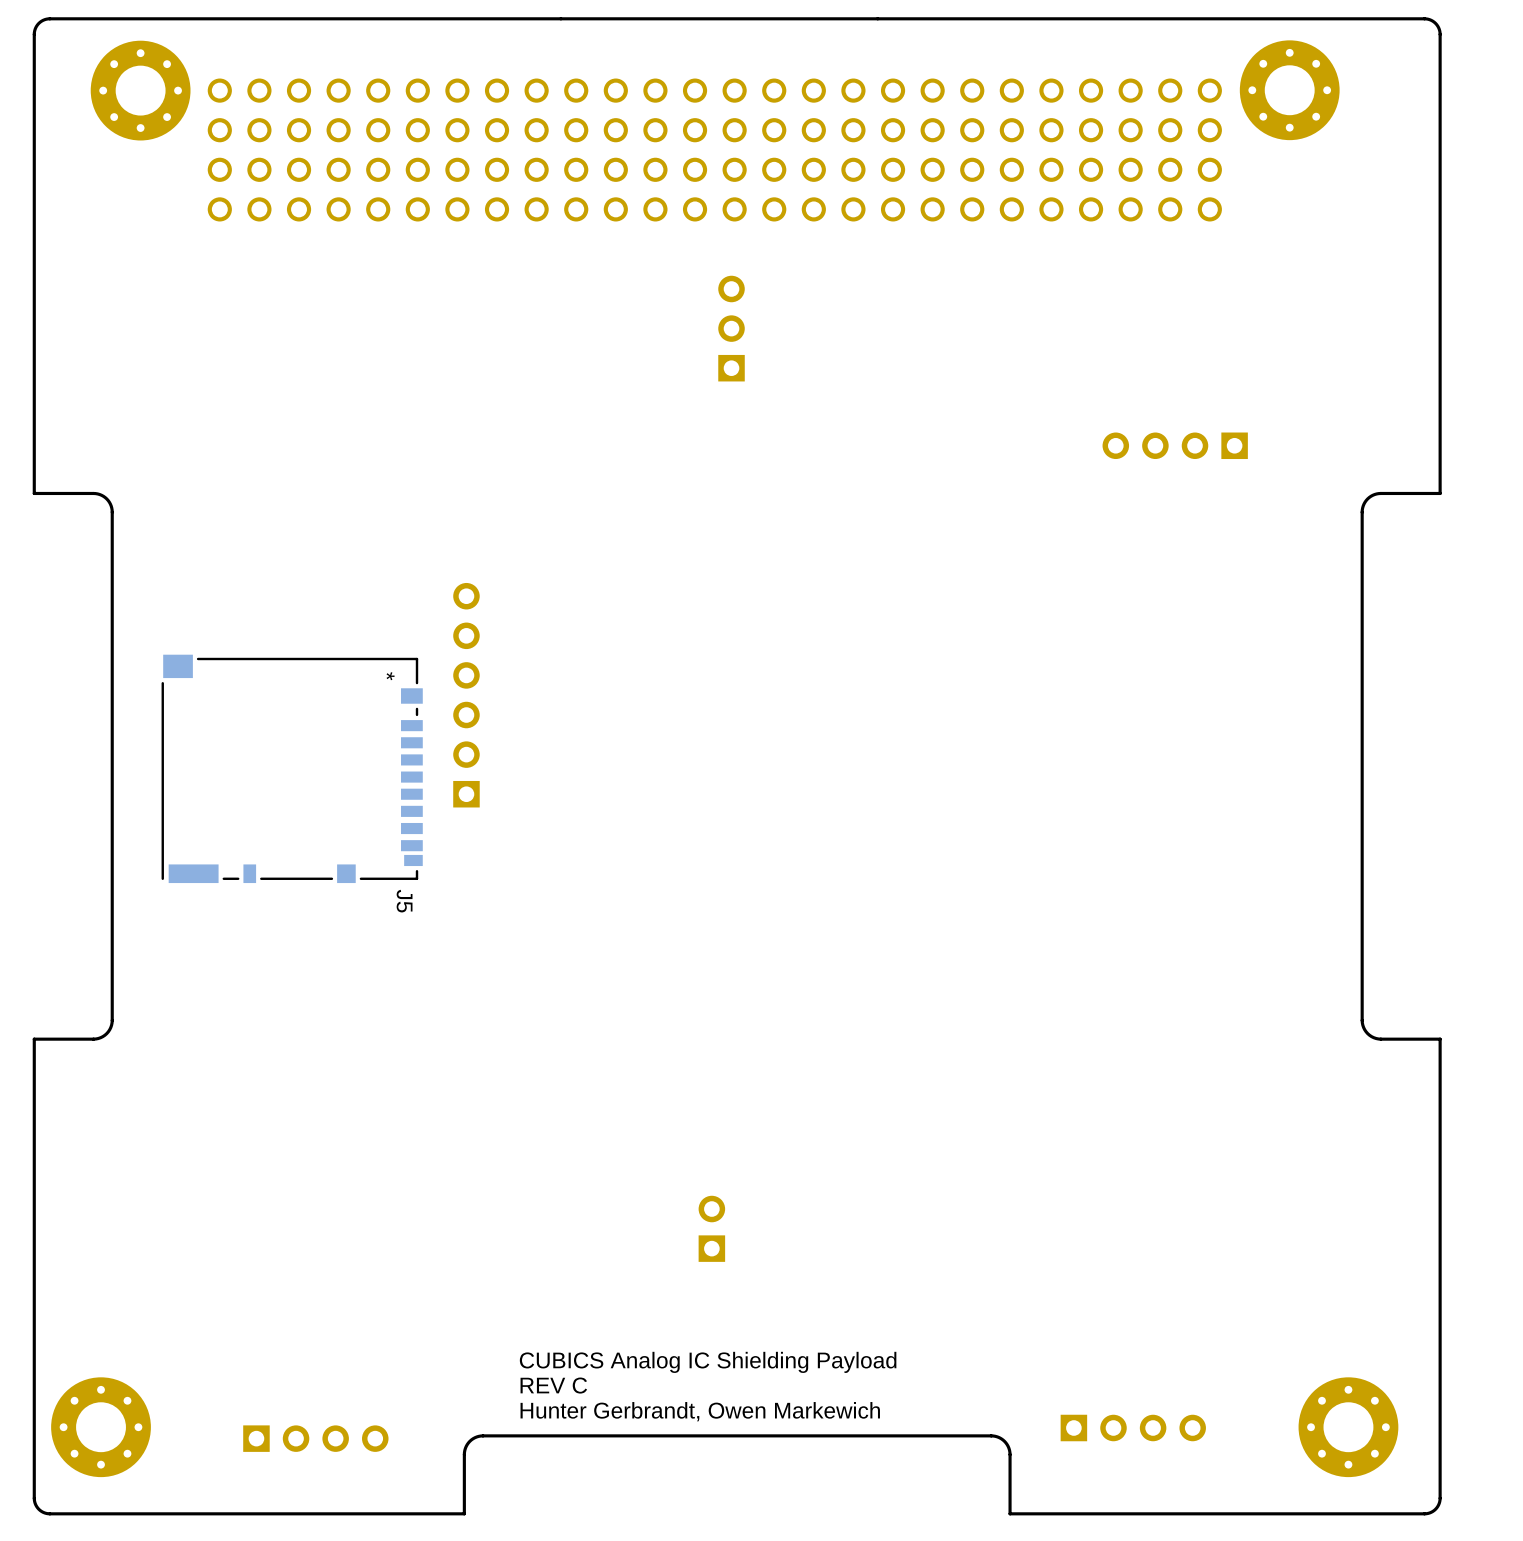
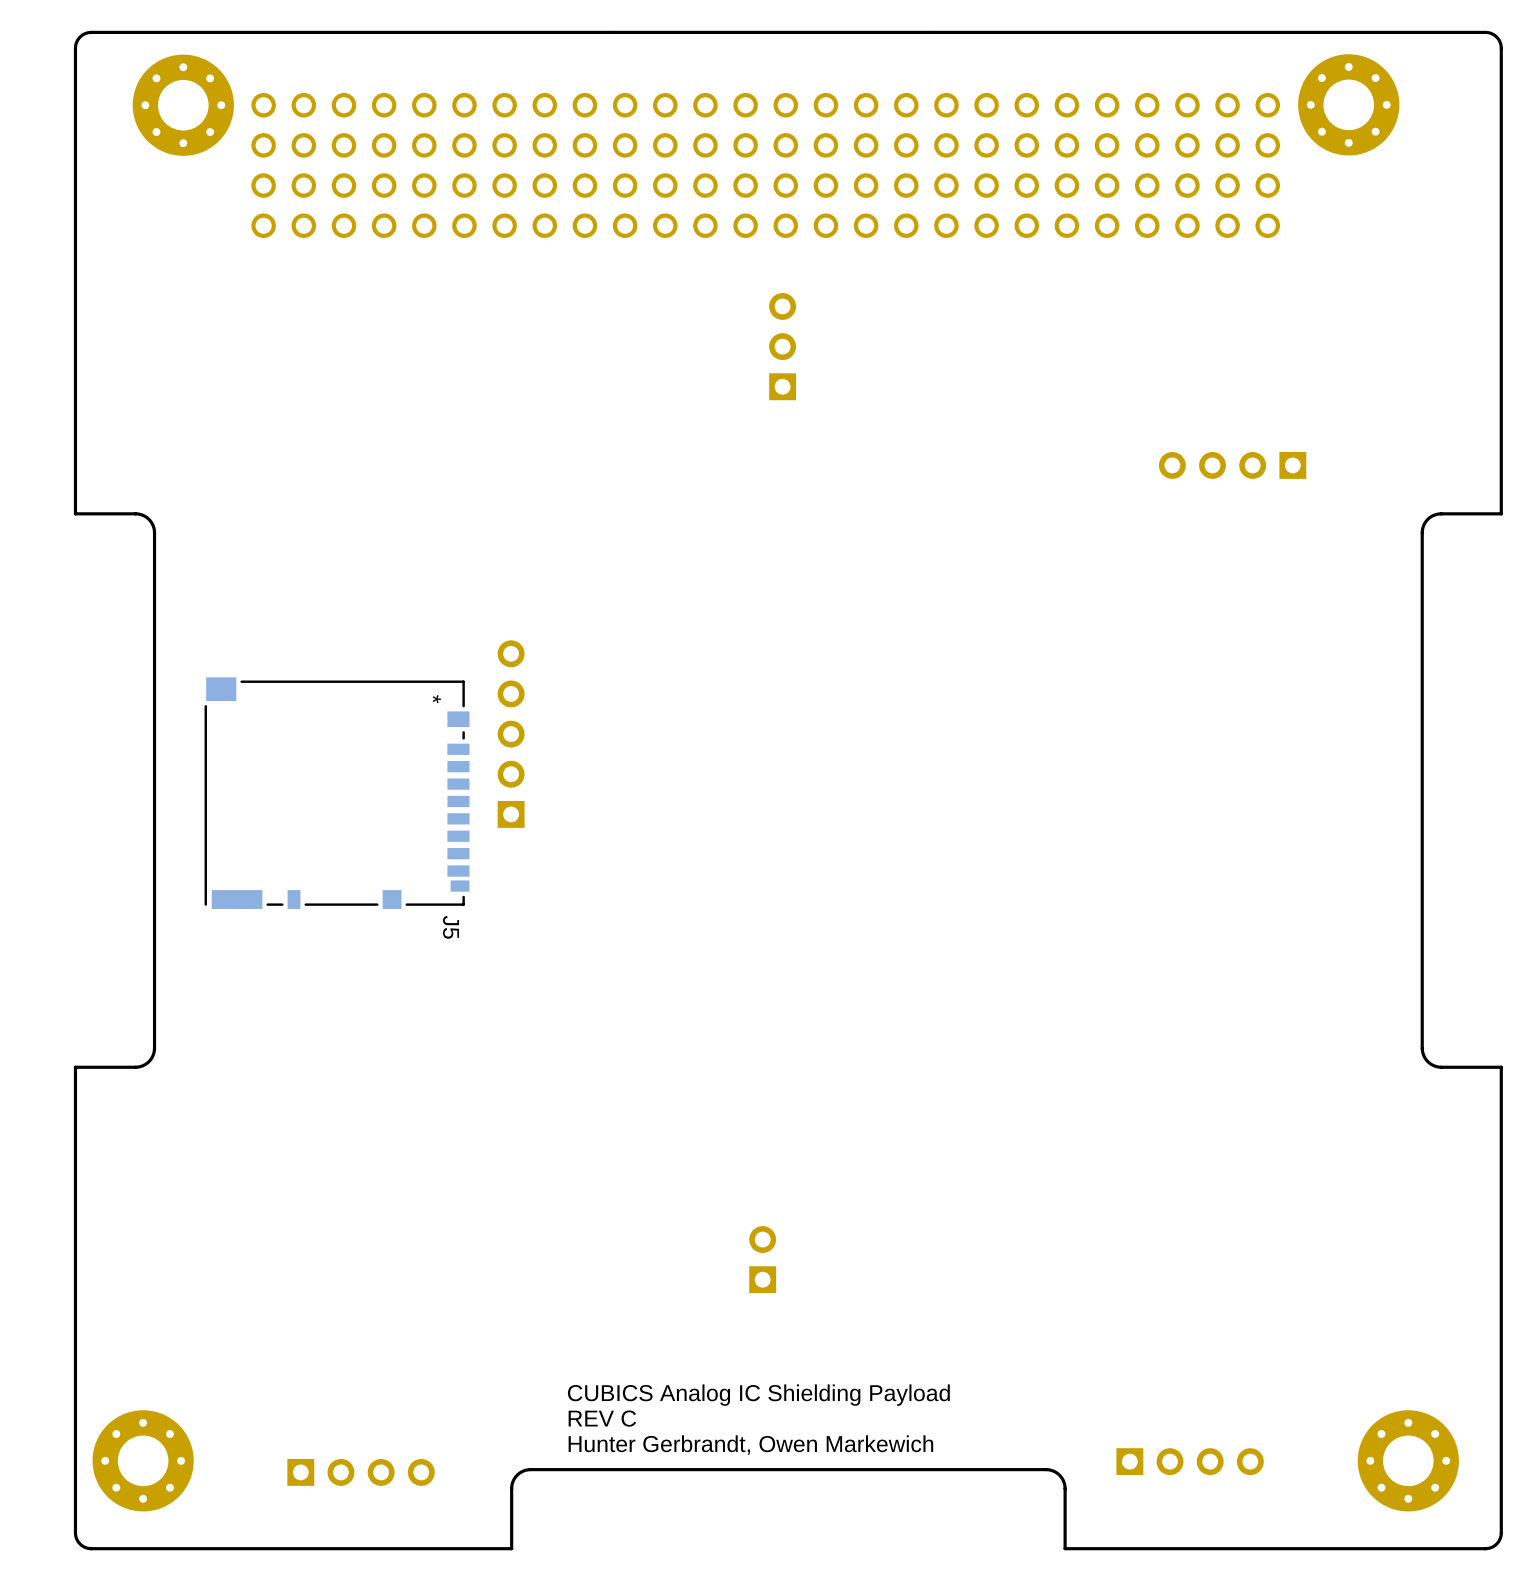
part: (466, 695) -> none
part: none -> (511, 734)

